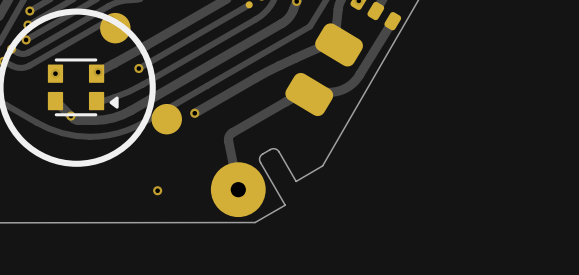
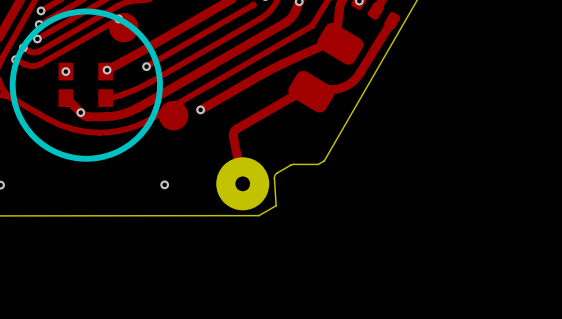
part footprint: [47, 58, 119, 117] -> [58, 62, 113, 107]
board edge: (260, 162) (261, 154) (274, 148) (278, 151) (296, 181) (316, 169) -> (276, 205) (274, 177) (276, 173) (292, 164) (318, 164)
board edge: (260, 162) (285, 205) (272, 212) -> none

